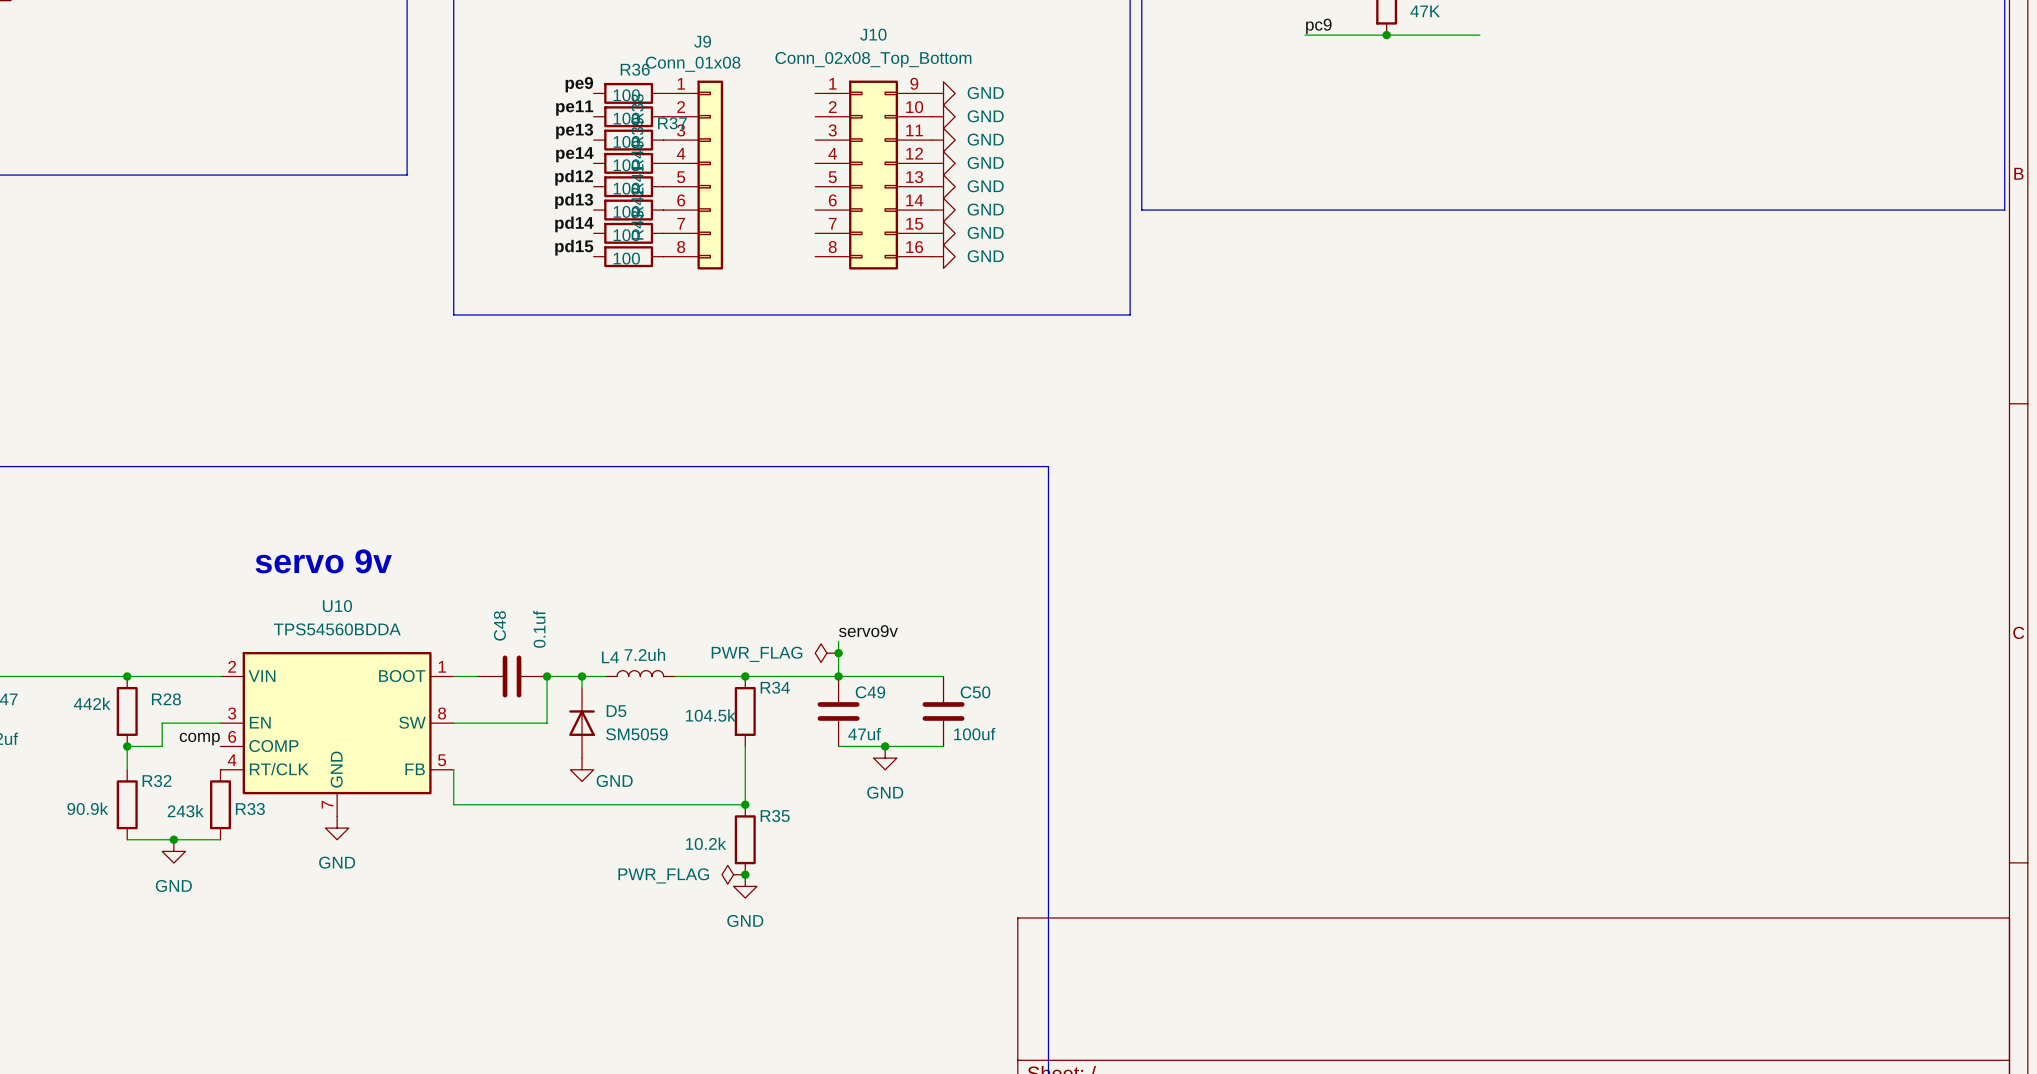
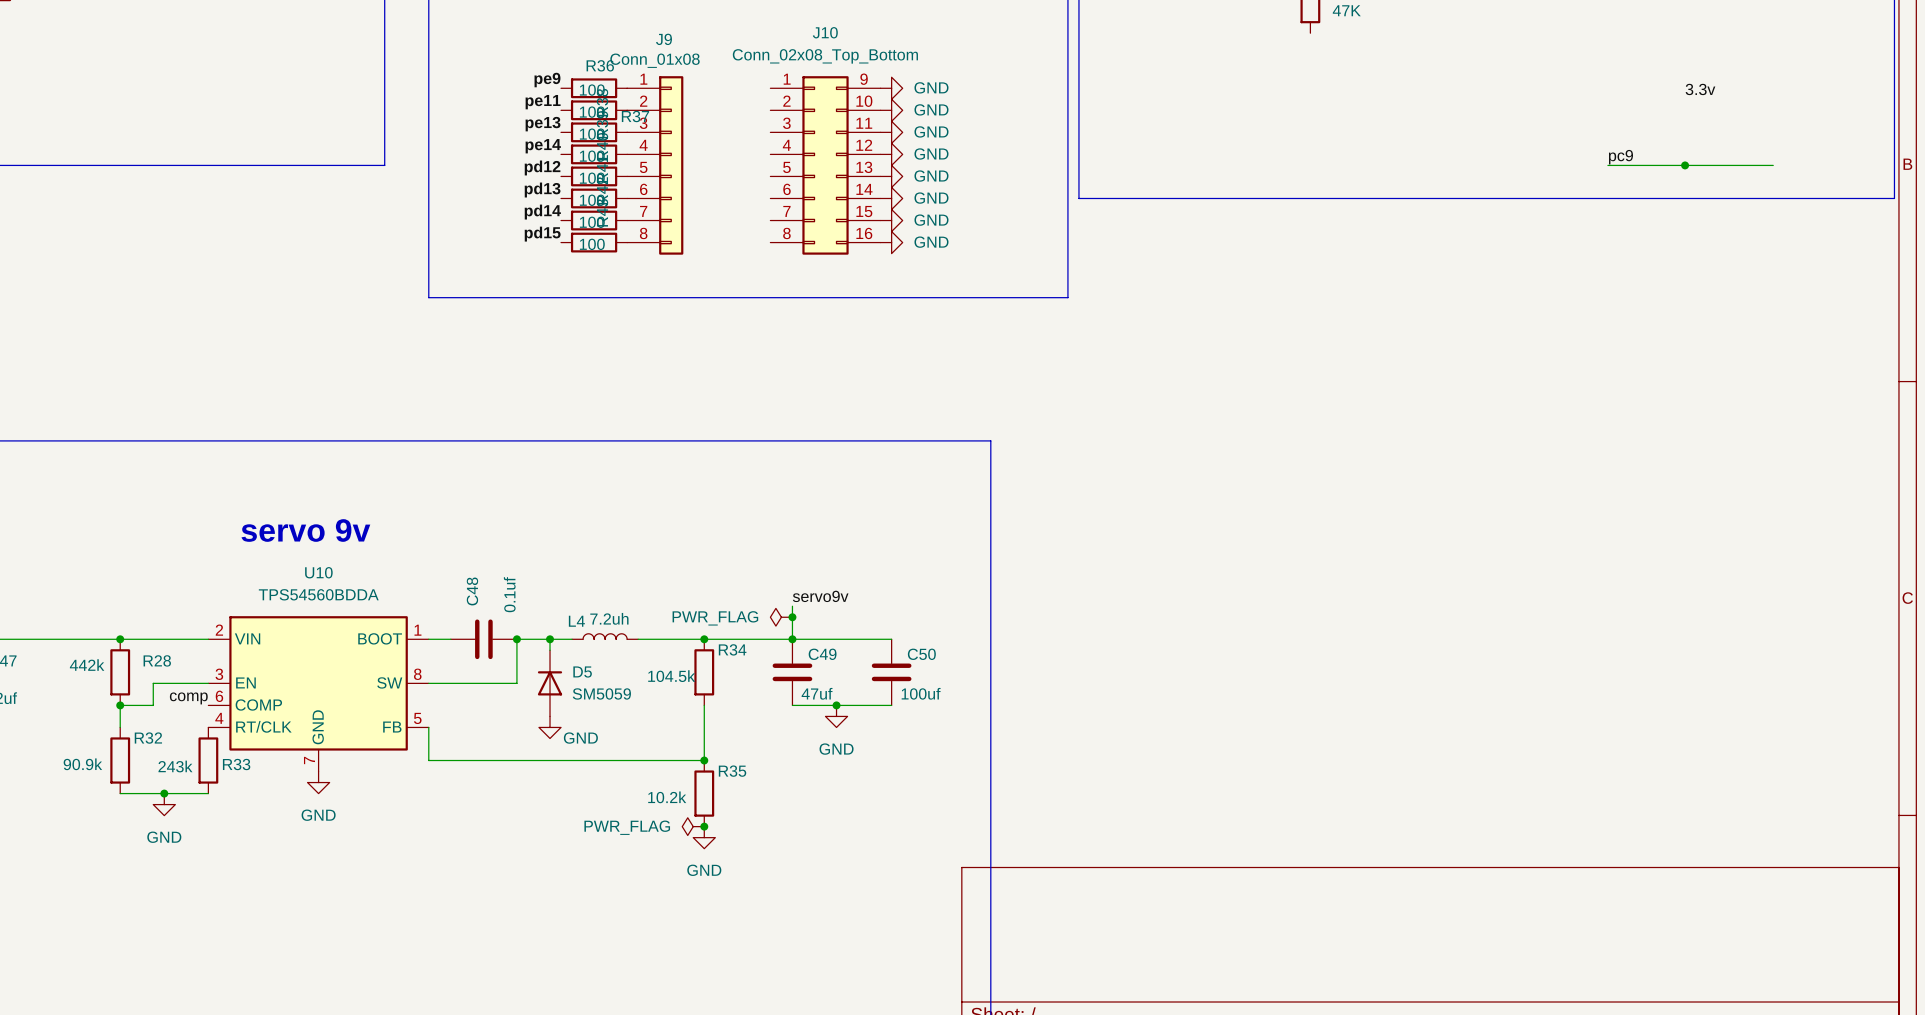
label: pc9 (1318, 26) -> none
wire: (1305, 35) (1479, 35) -> none
junction: (1386, 35) -> none
label: none -> 3.3v (1700, 89)
label: none -> pc9 (1620, 157)
wire: none -> (1607, 165) (1773, 165)
junction: none -> (1685, 165)

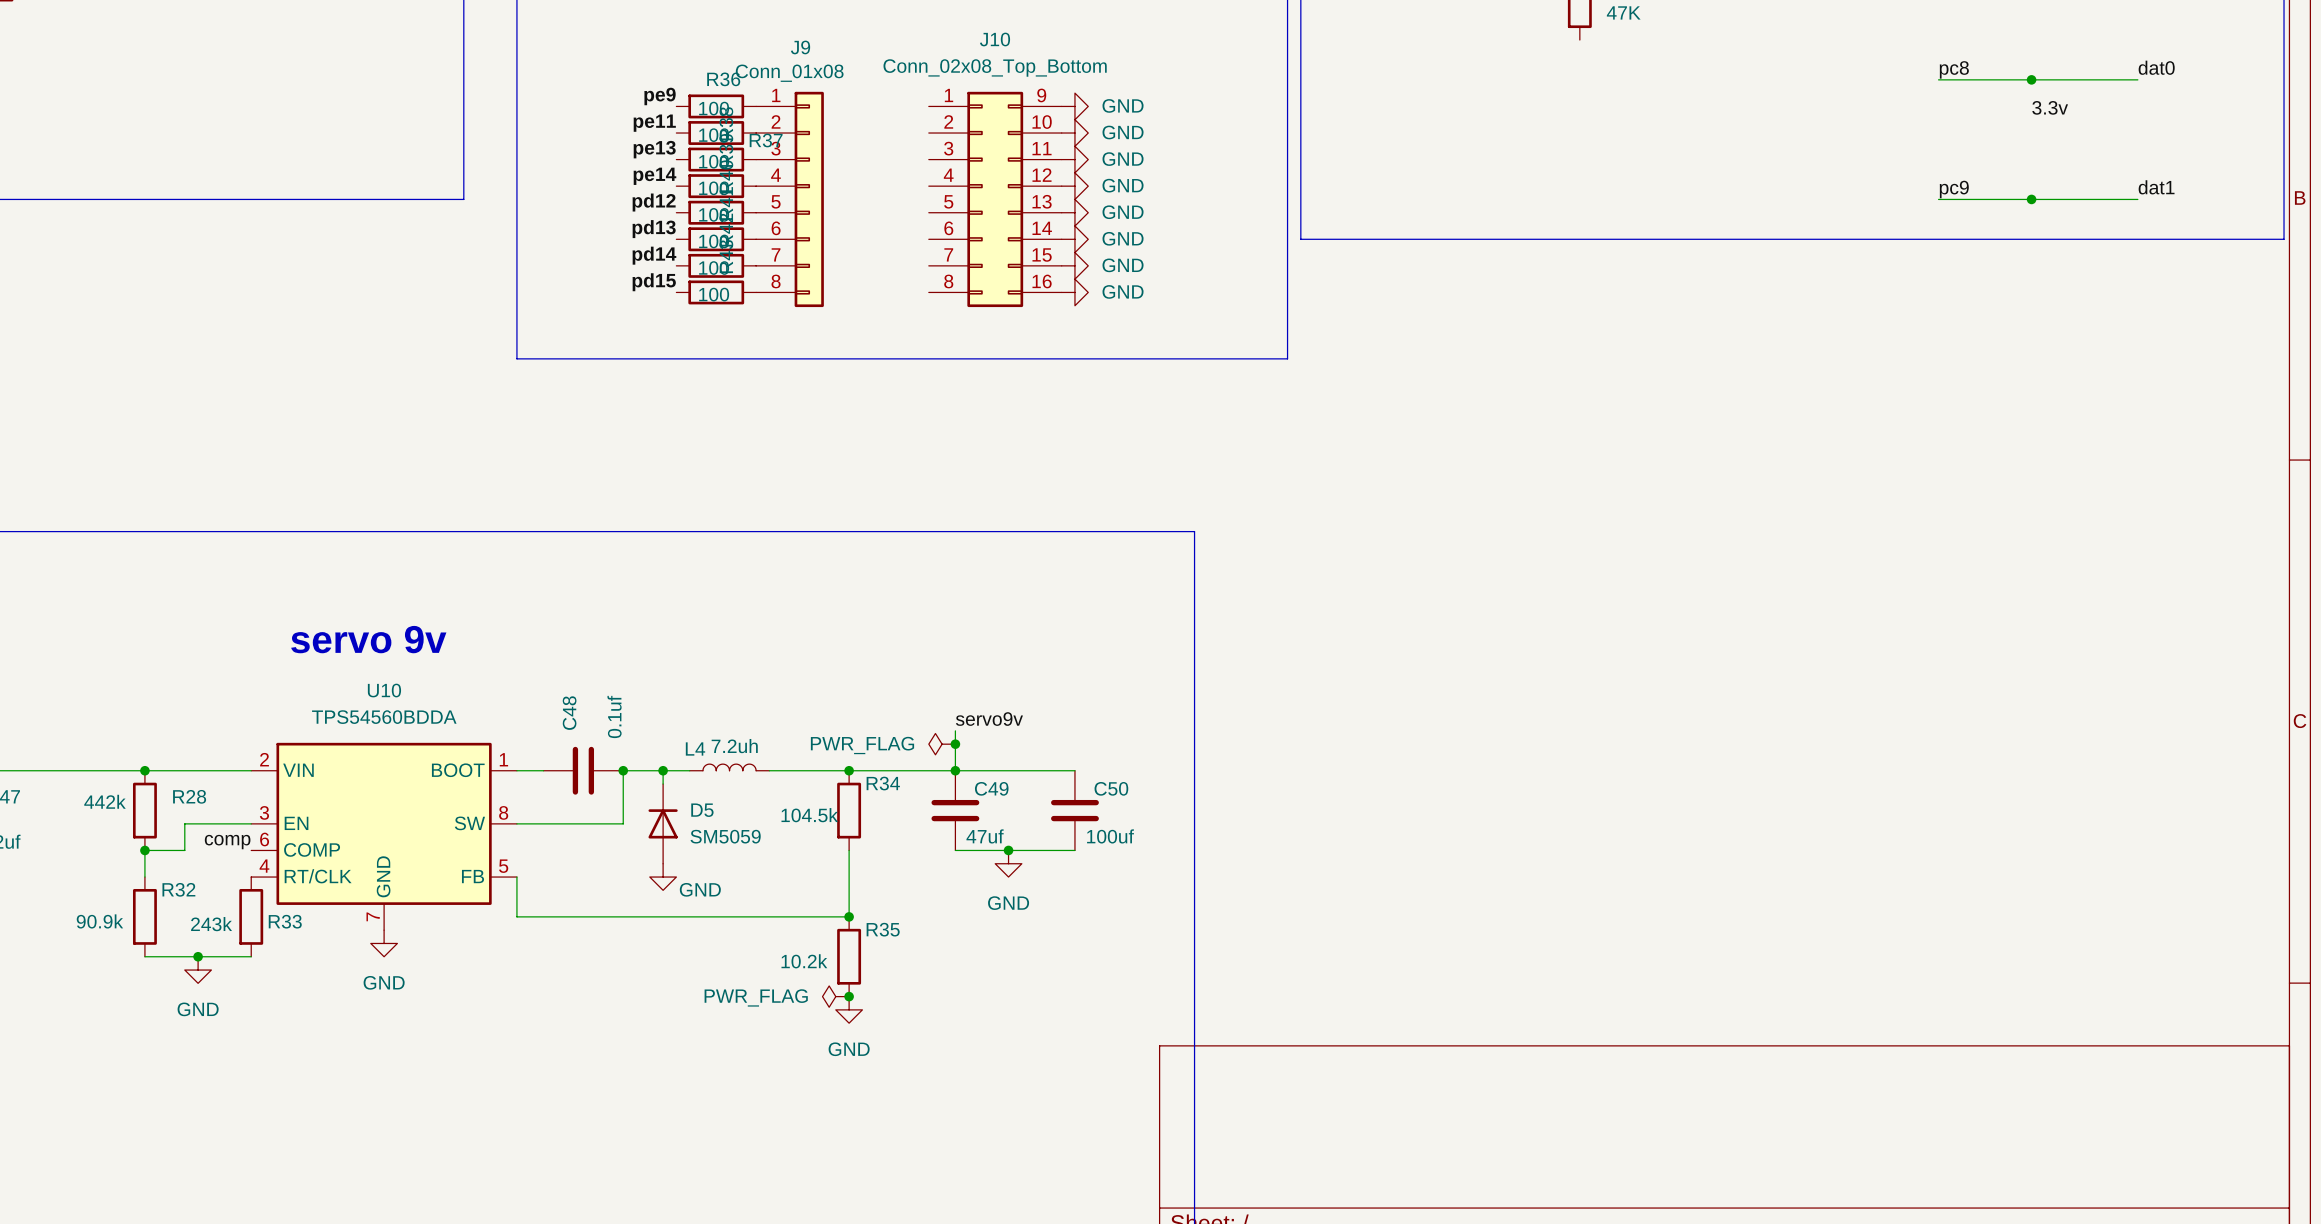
label: none -> dat0 (2156, 67)
label: none -> pc8 (1954, 69)
wire: none -> (1938, 79) (2137, 79)
junction: none -> (2031, 79)
label: none -> dat1 (2156, 187)

